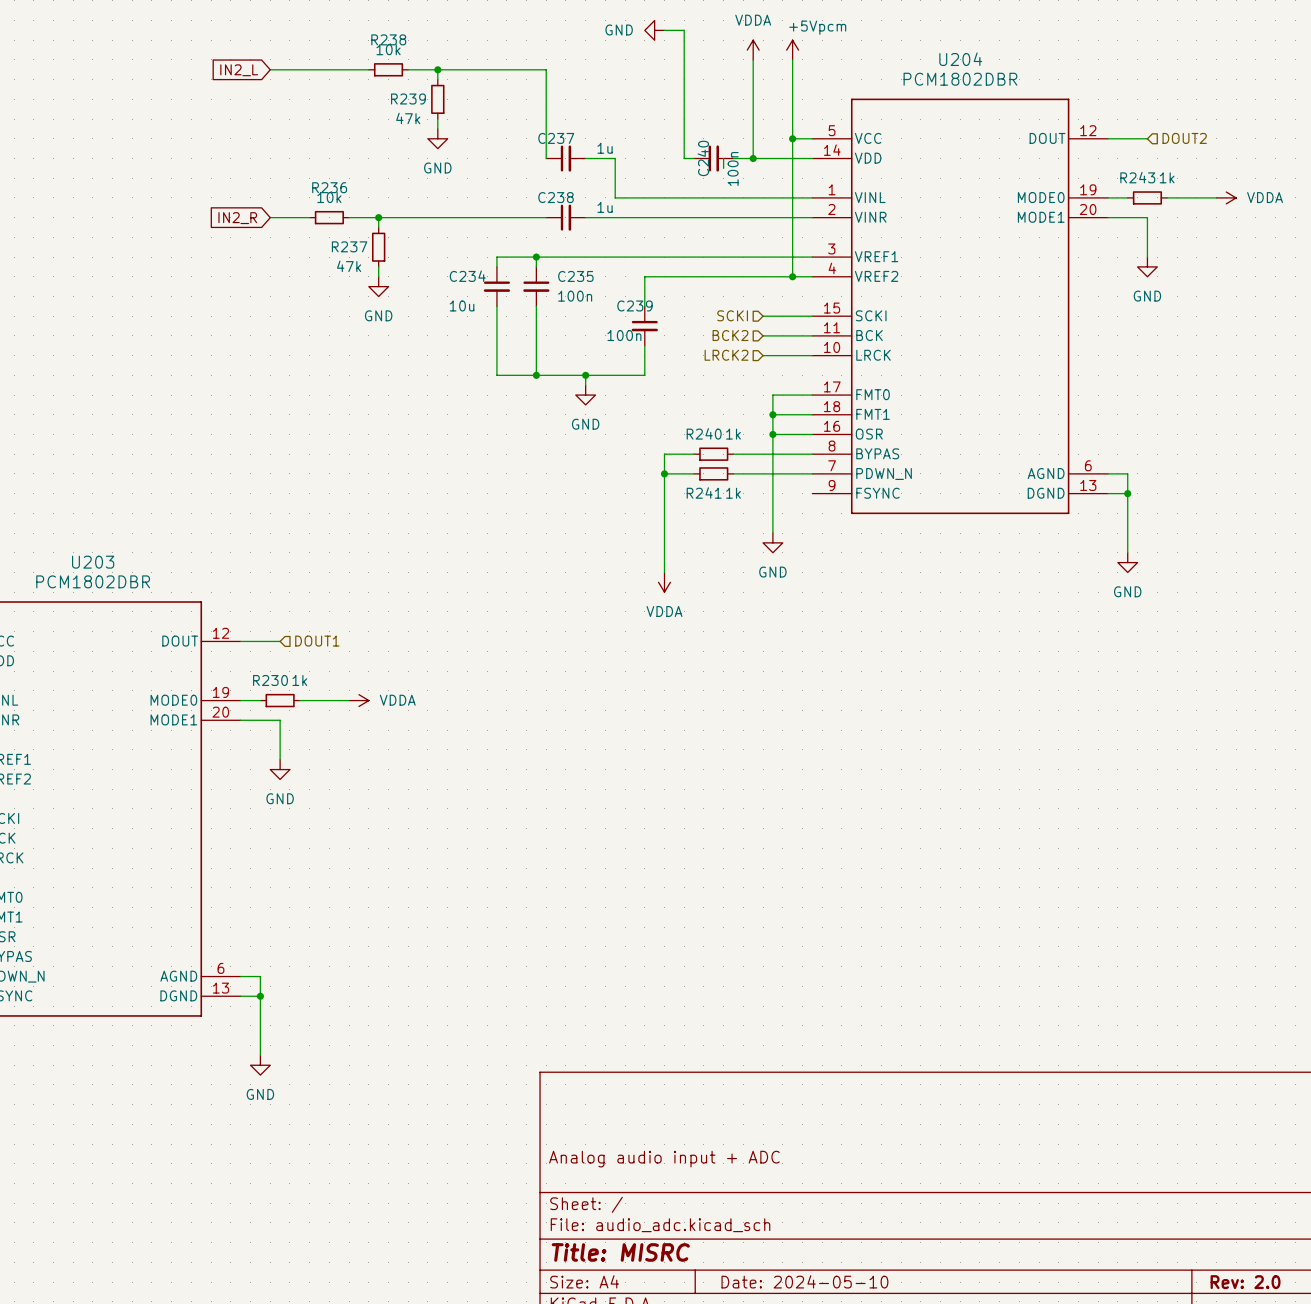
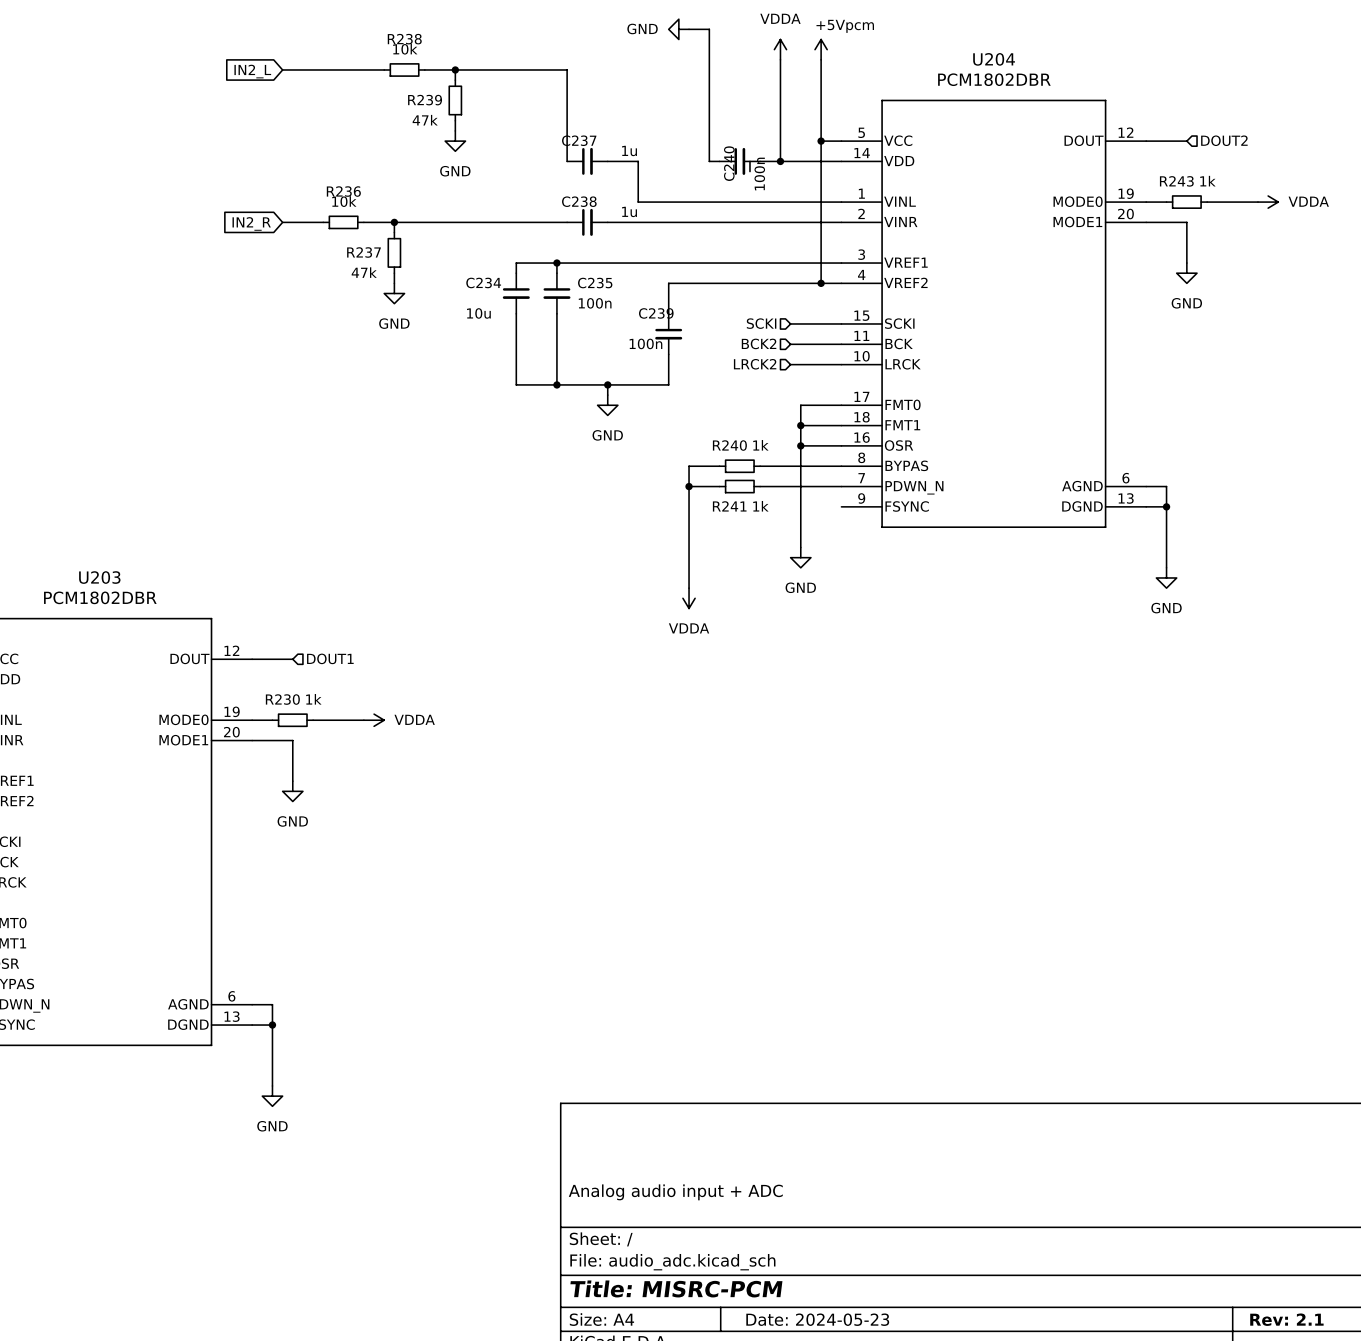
title block: Title: MISRC (620, 1252) -> Title: MISRC-PCM (676, 1288)
title block: Date: 2024-05-10 (804, 1281) -> Date: 2024-05-23 (817, 1319)
title block: Rev: 2.0 (1245, 1282) -> Rev: 2.1 (1286, 1319)

